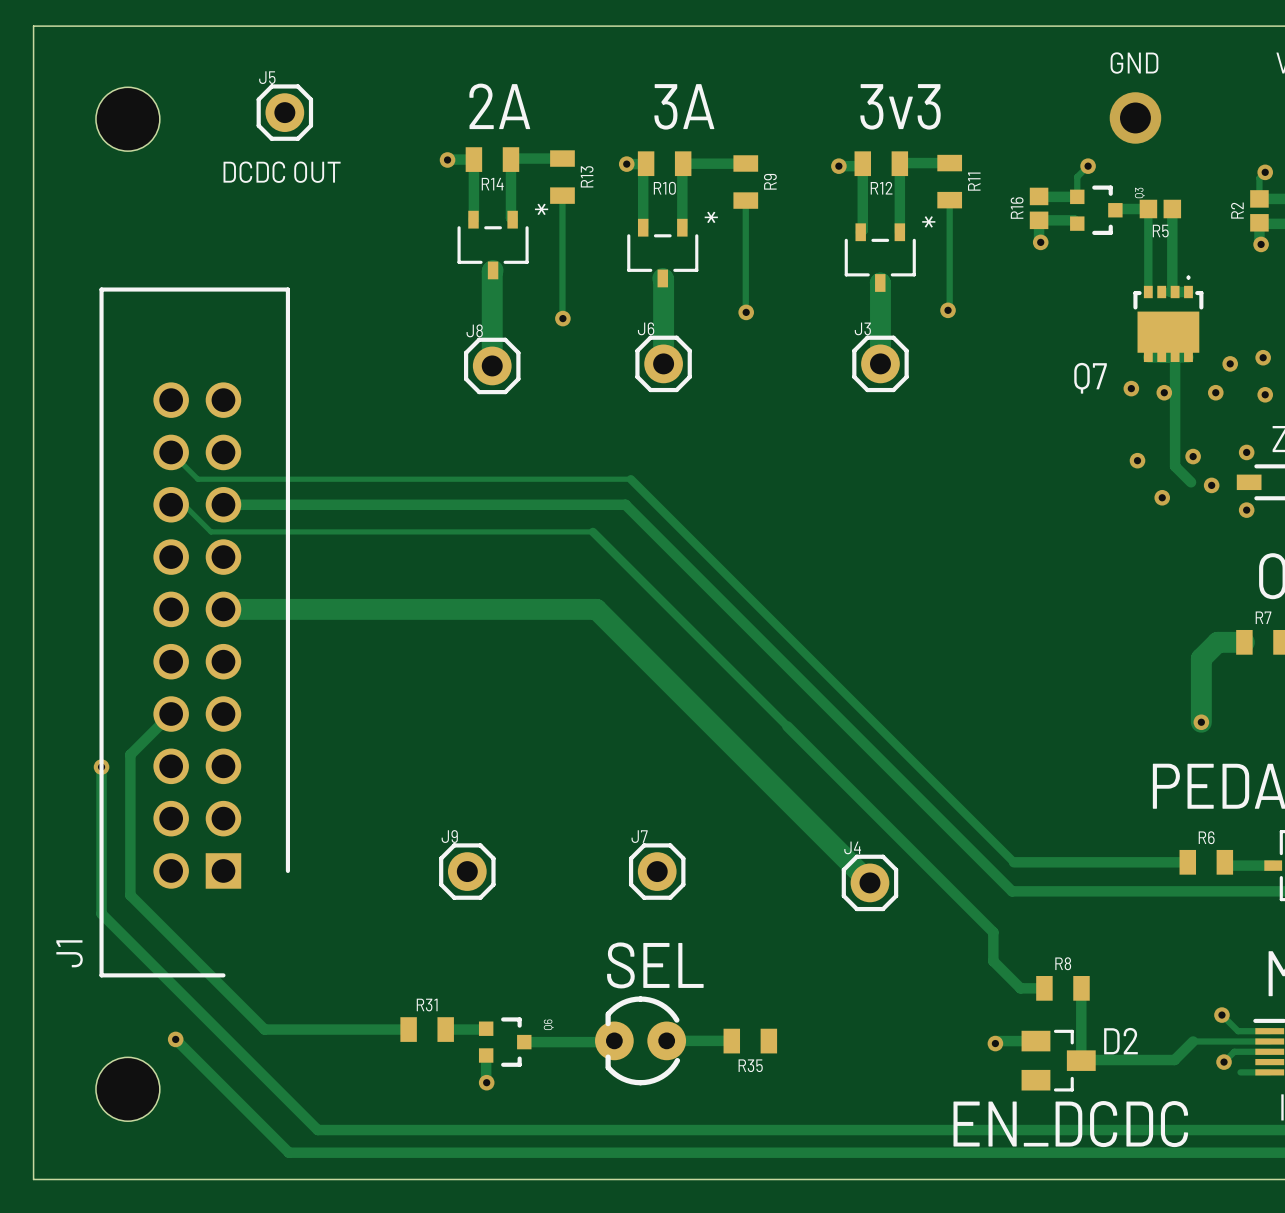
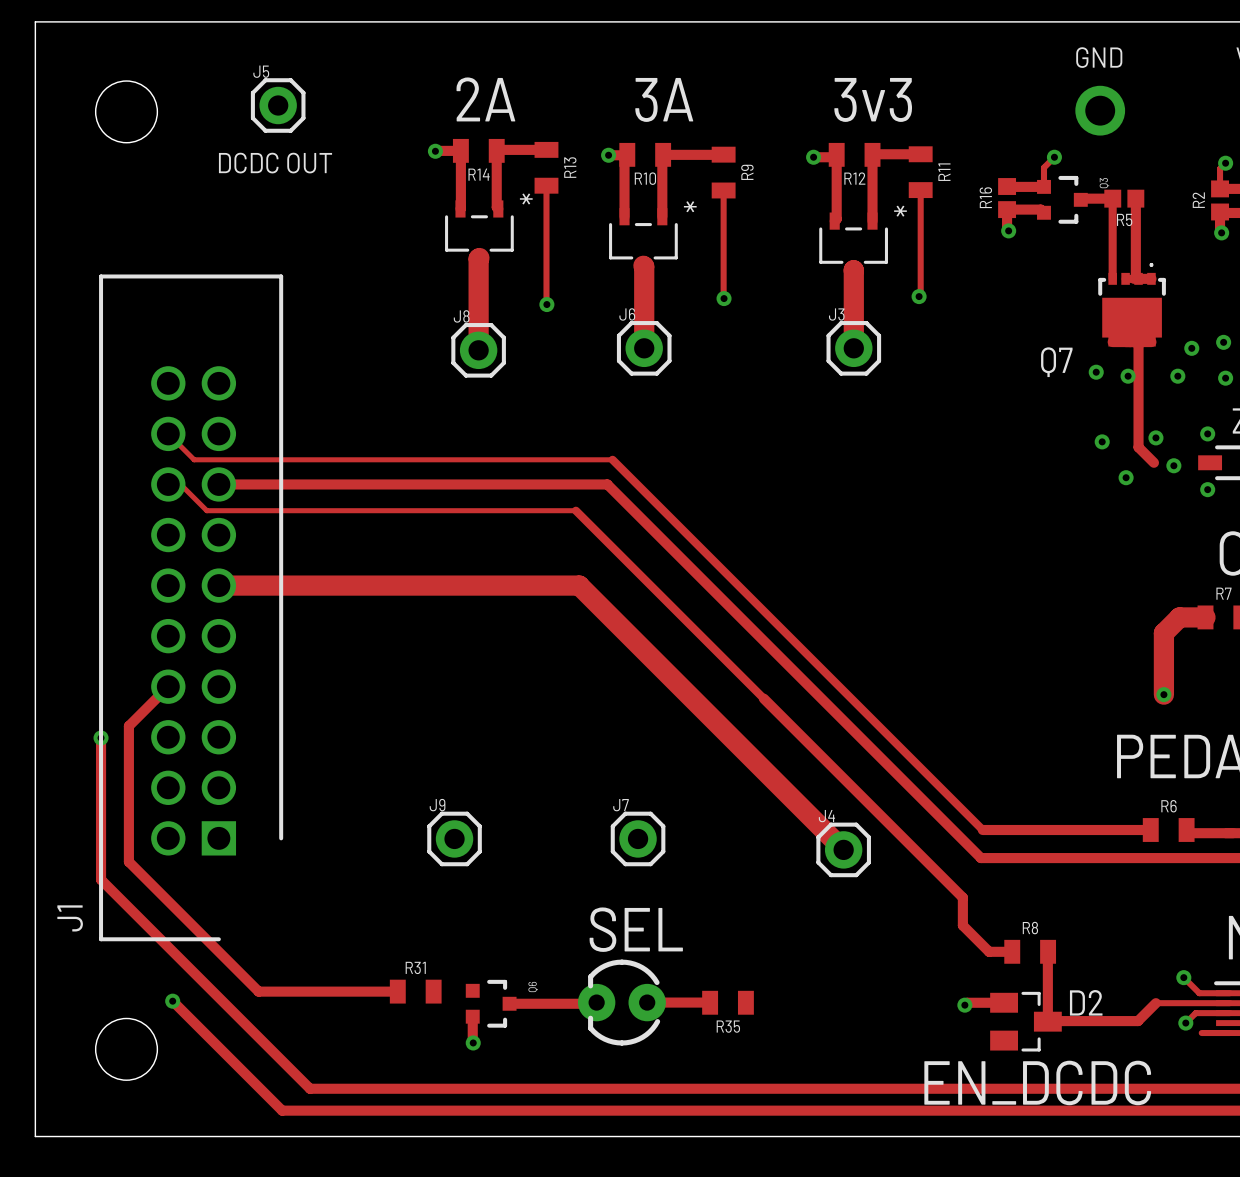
track: (486, 1028) (445, 1029) -> none

